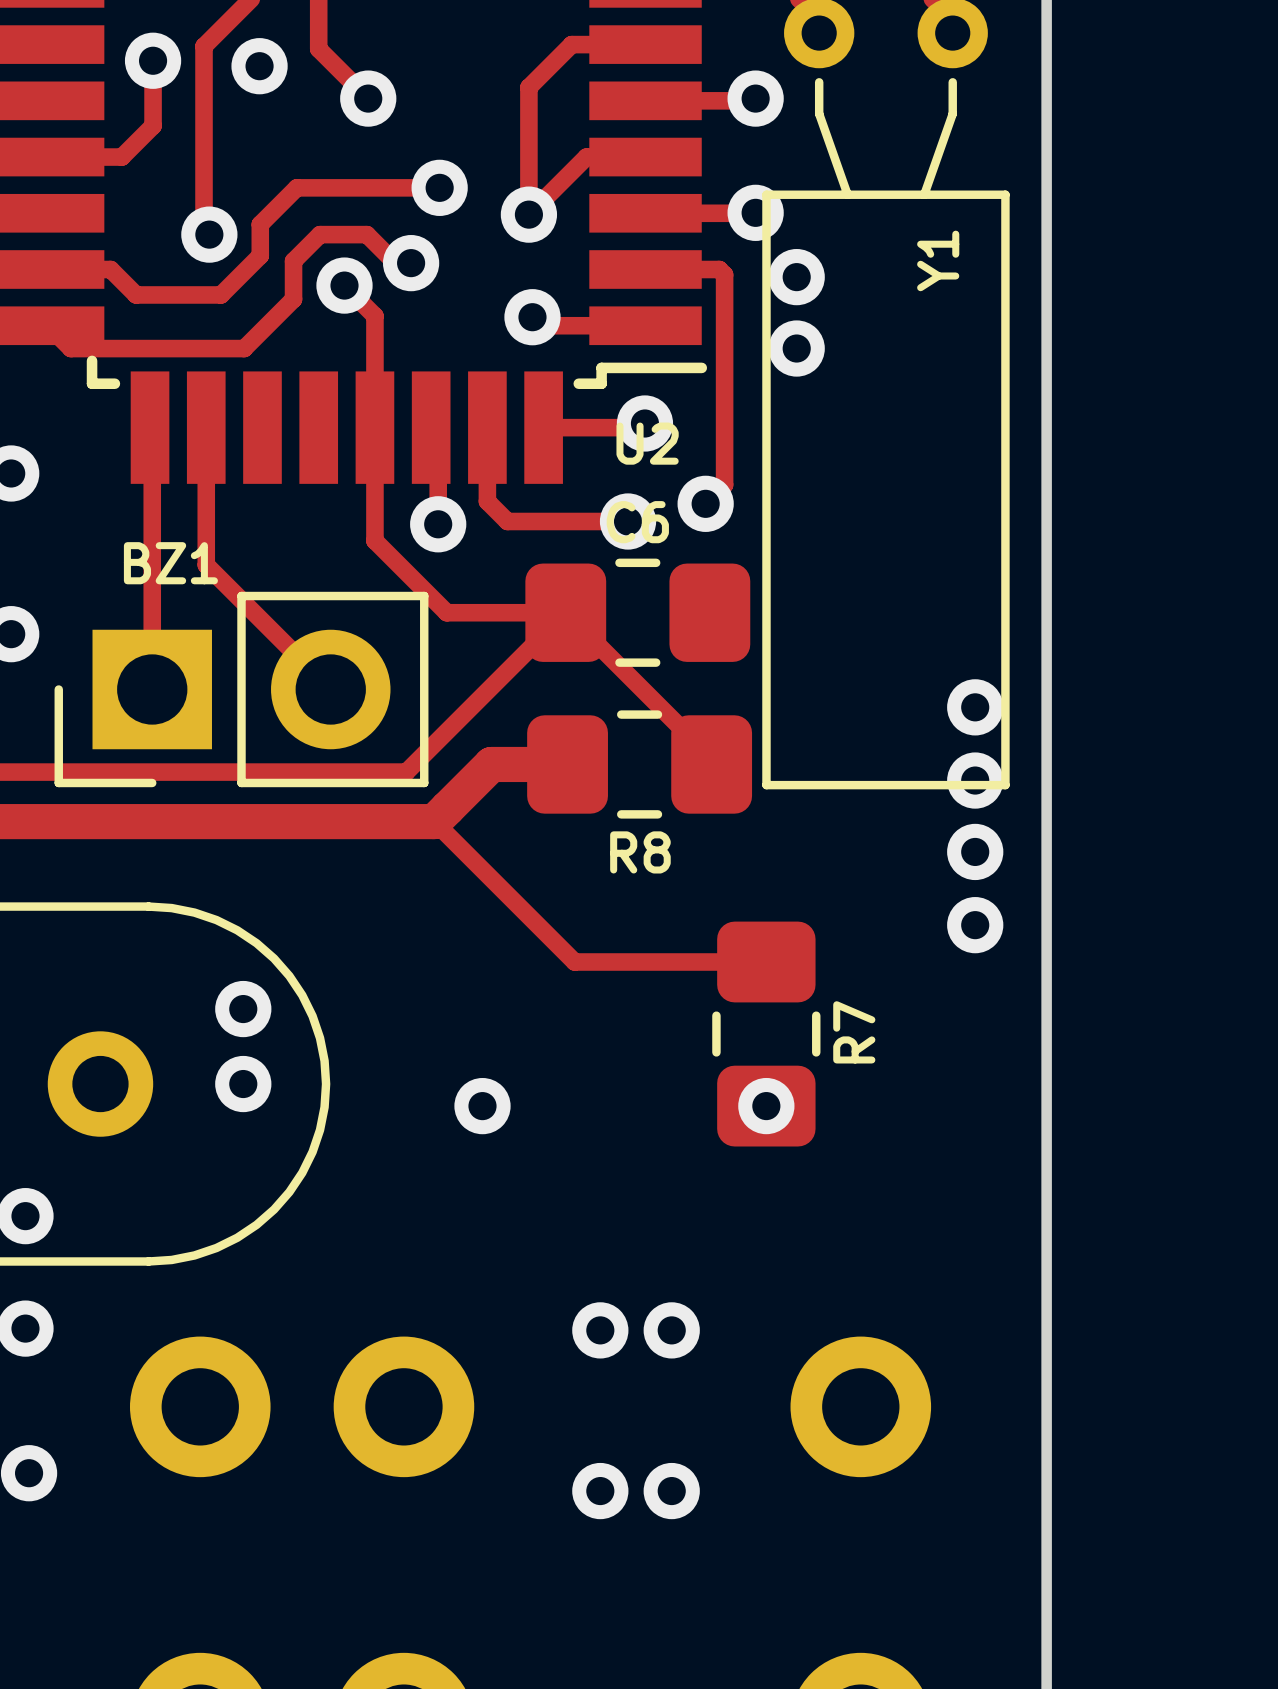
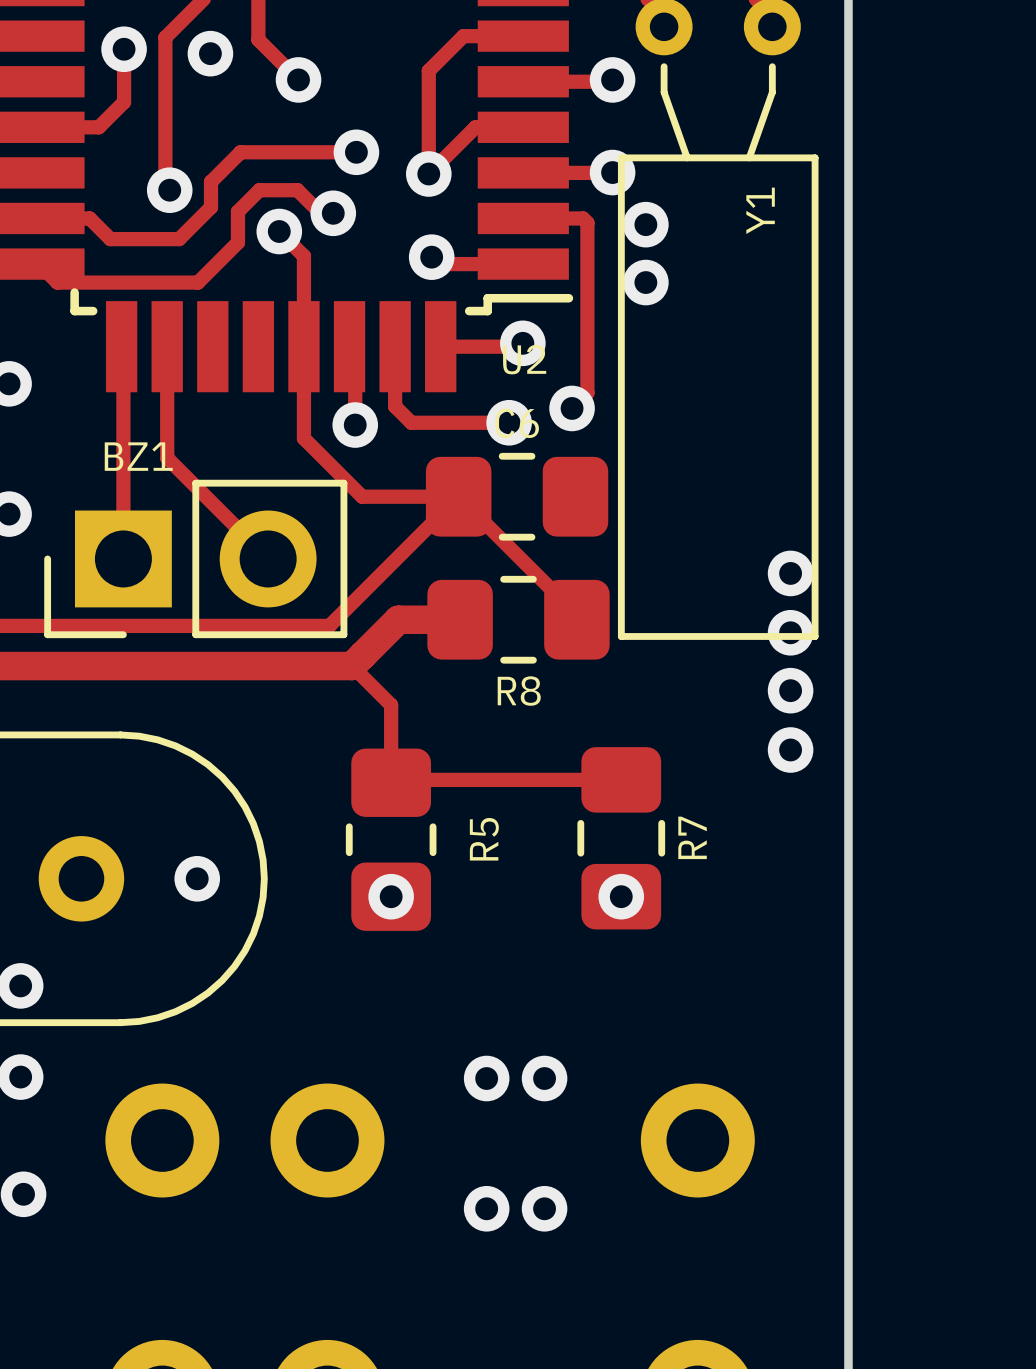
track: (482, 869) (574, 962) -> (391, 705) (391, 782) (394, 779) (465, 779)
via: (243, 1009) -> none
R5: none -> (391, 839)

